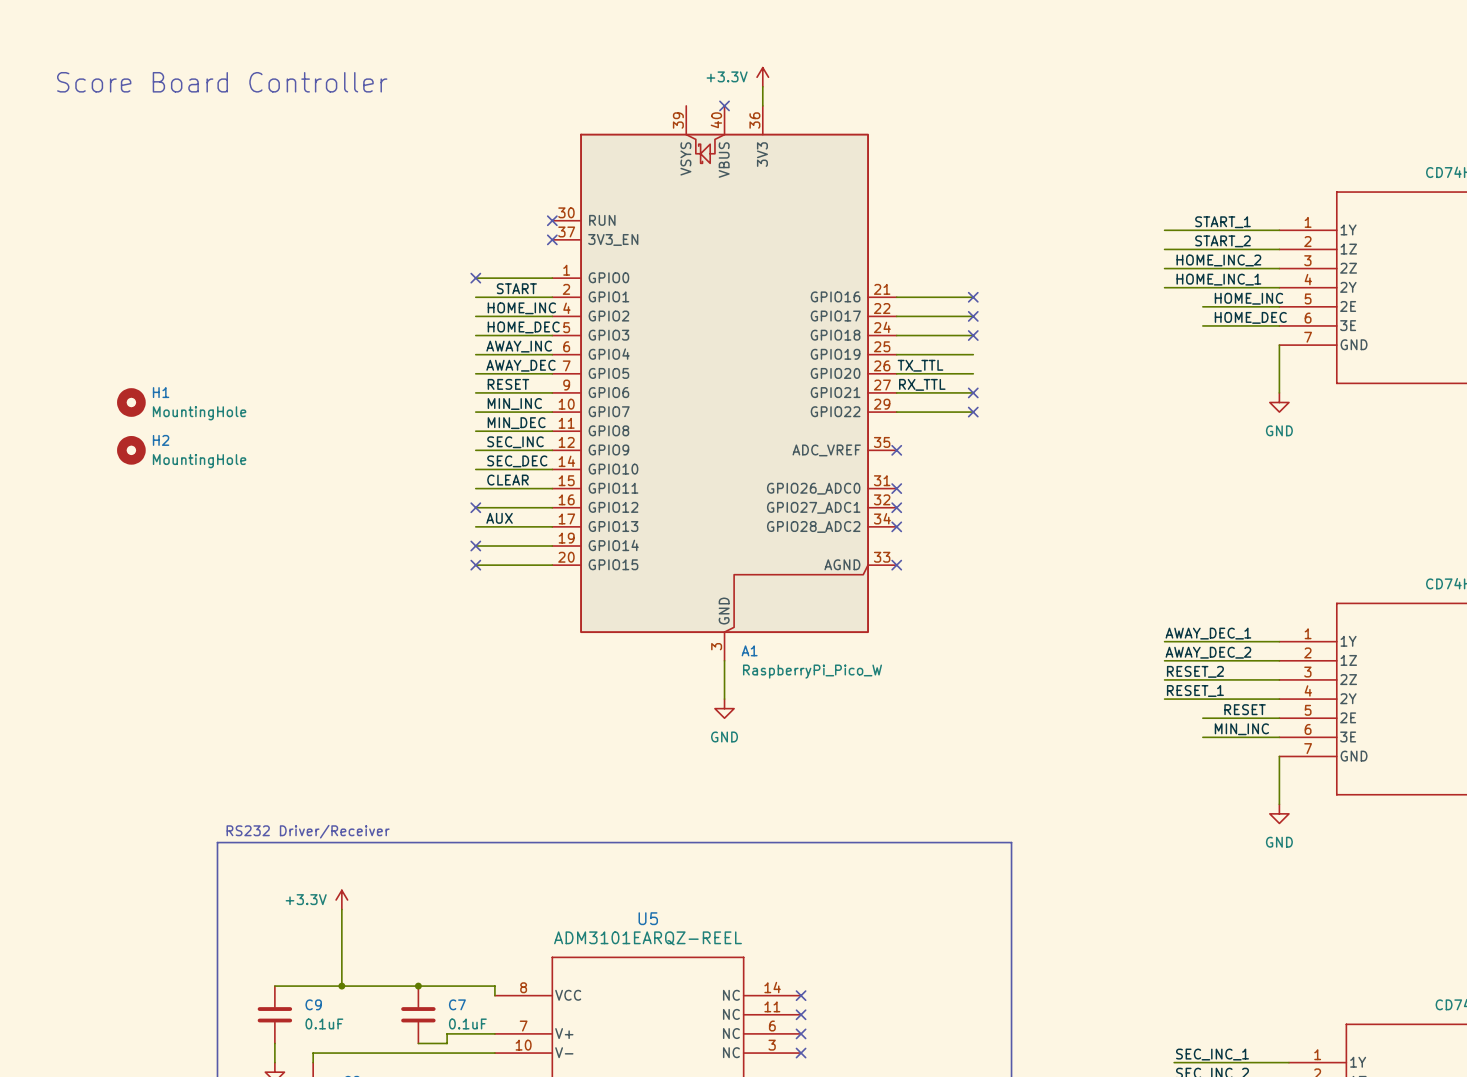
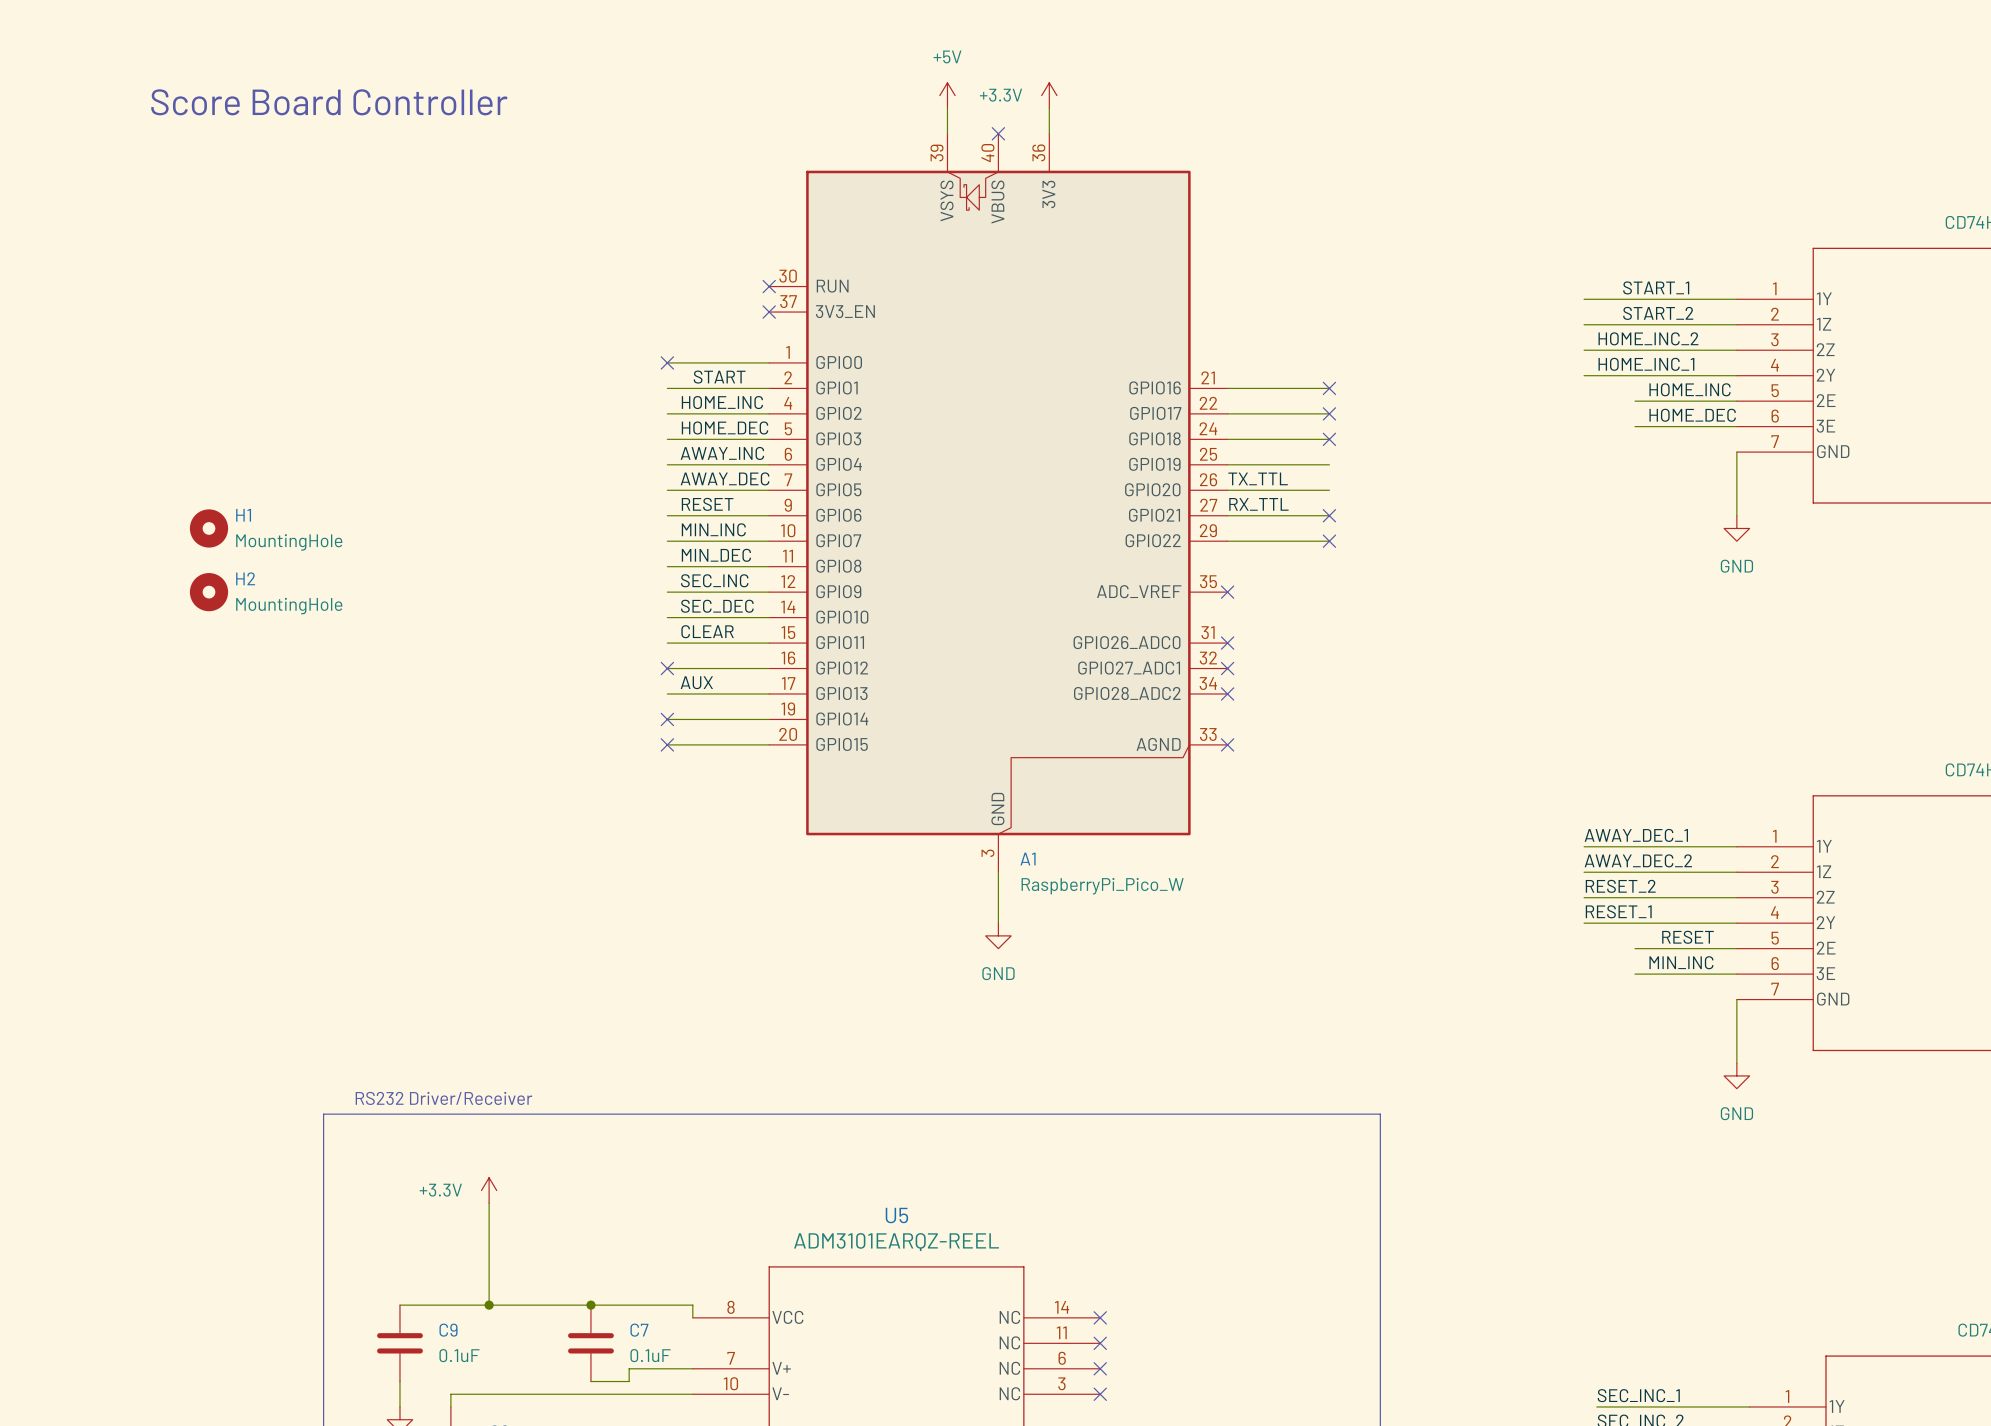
power symbol: none -> +5V (947, 95)
wire: none -> (947, 108) (947, 133)

